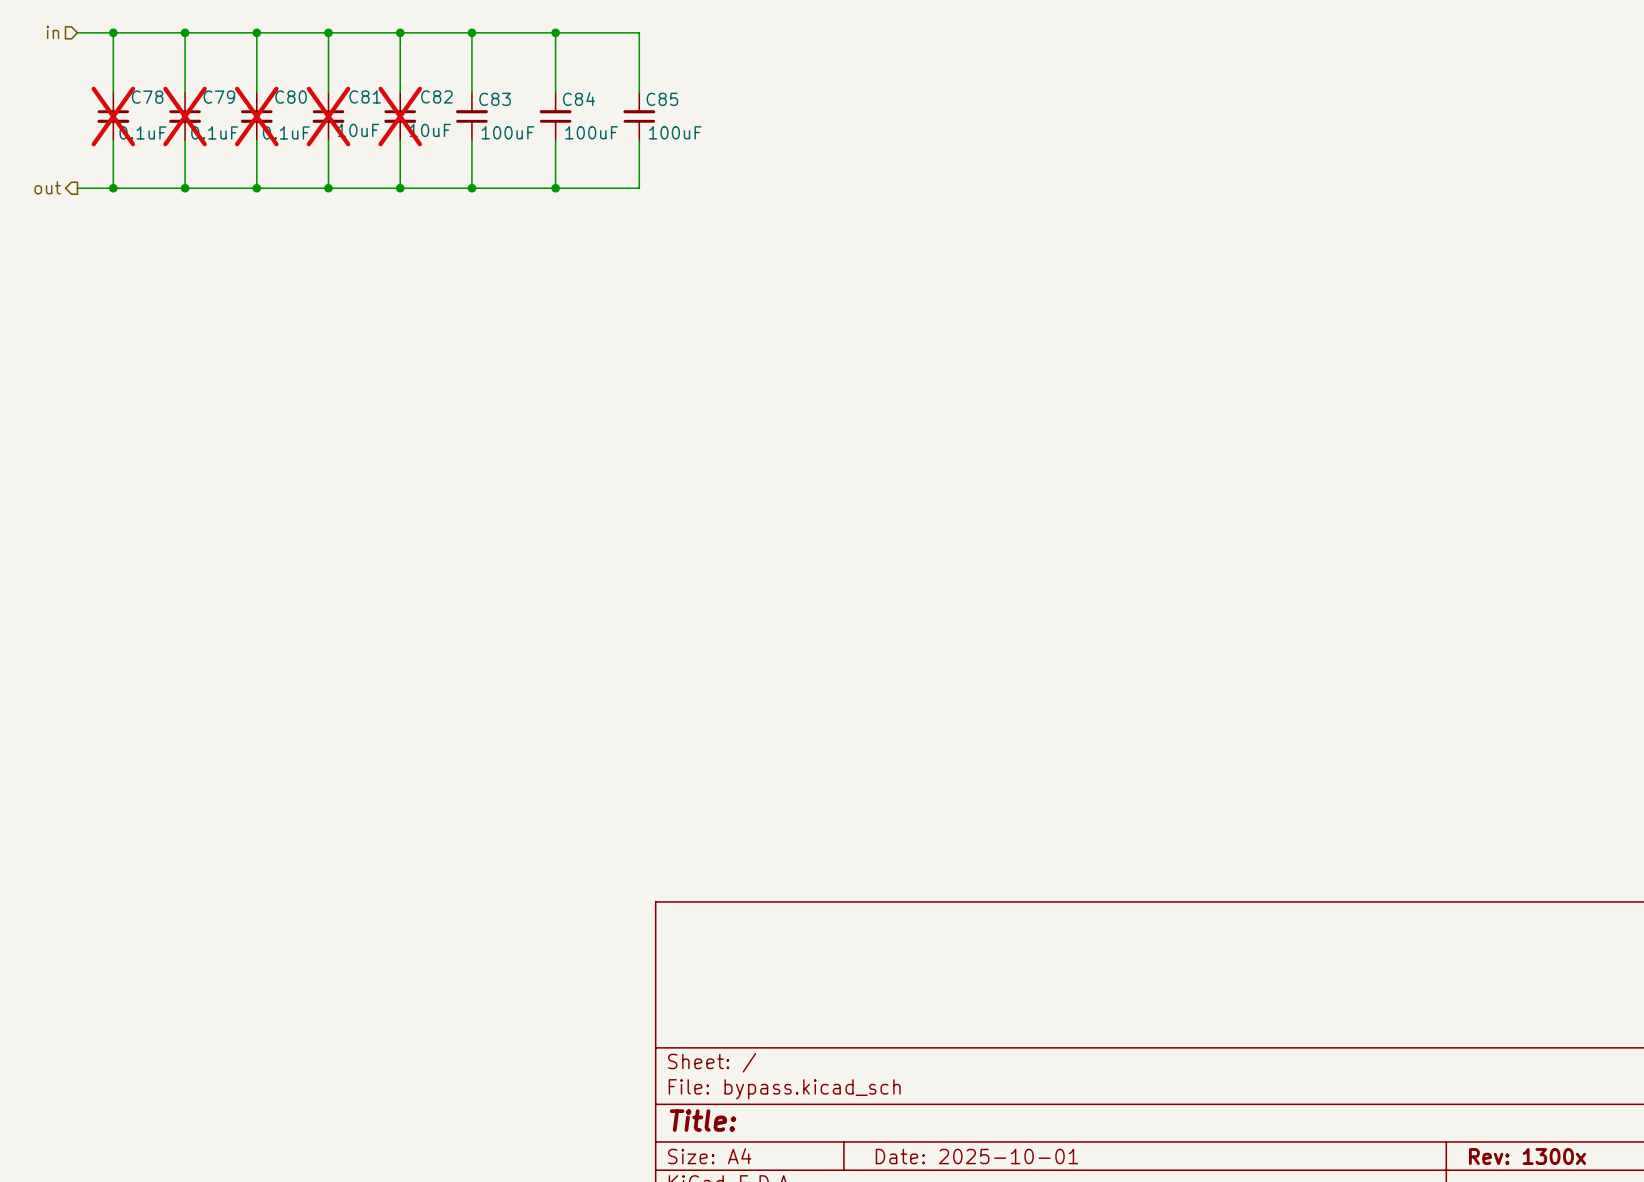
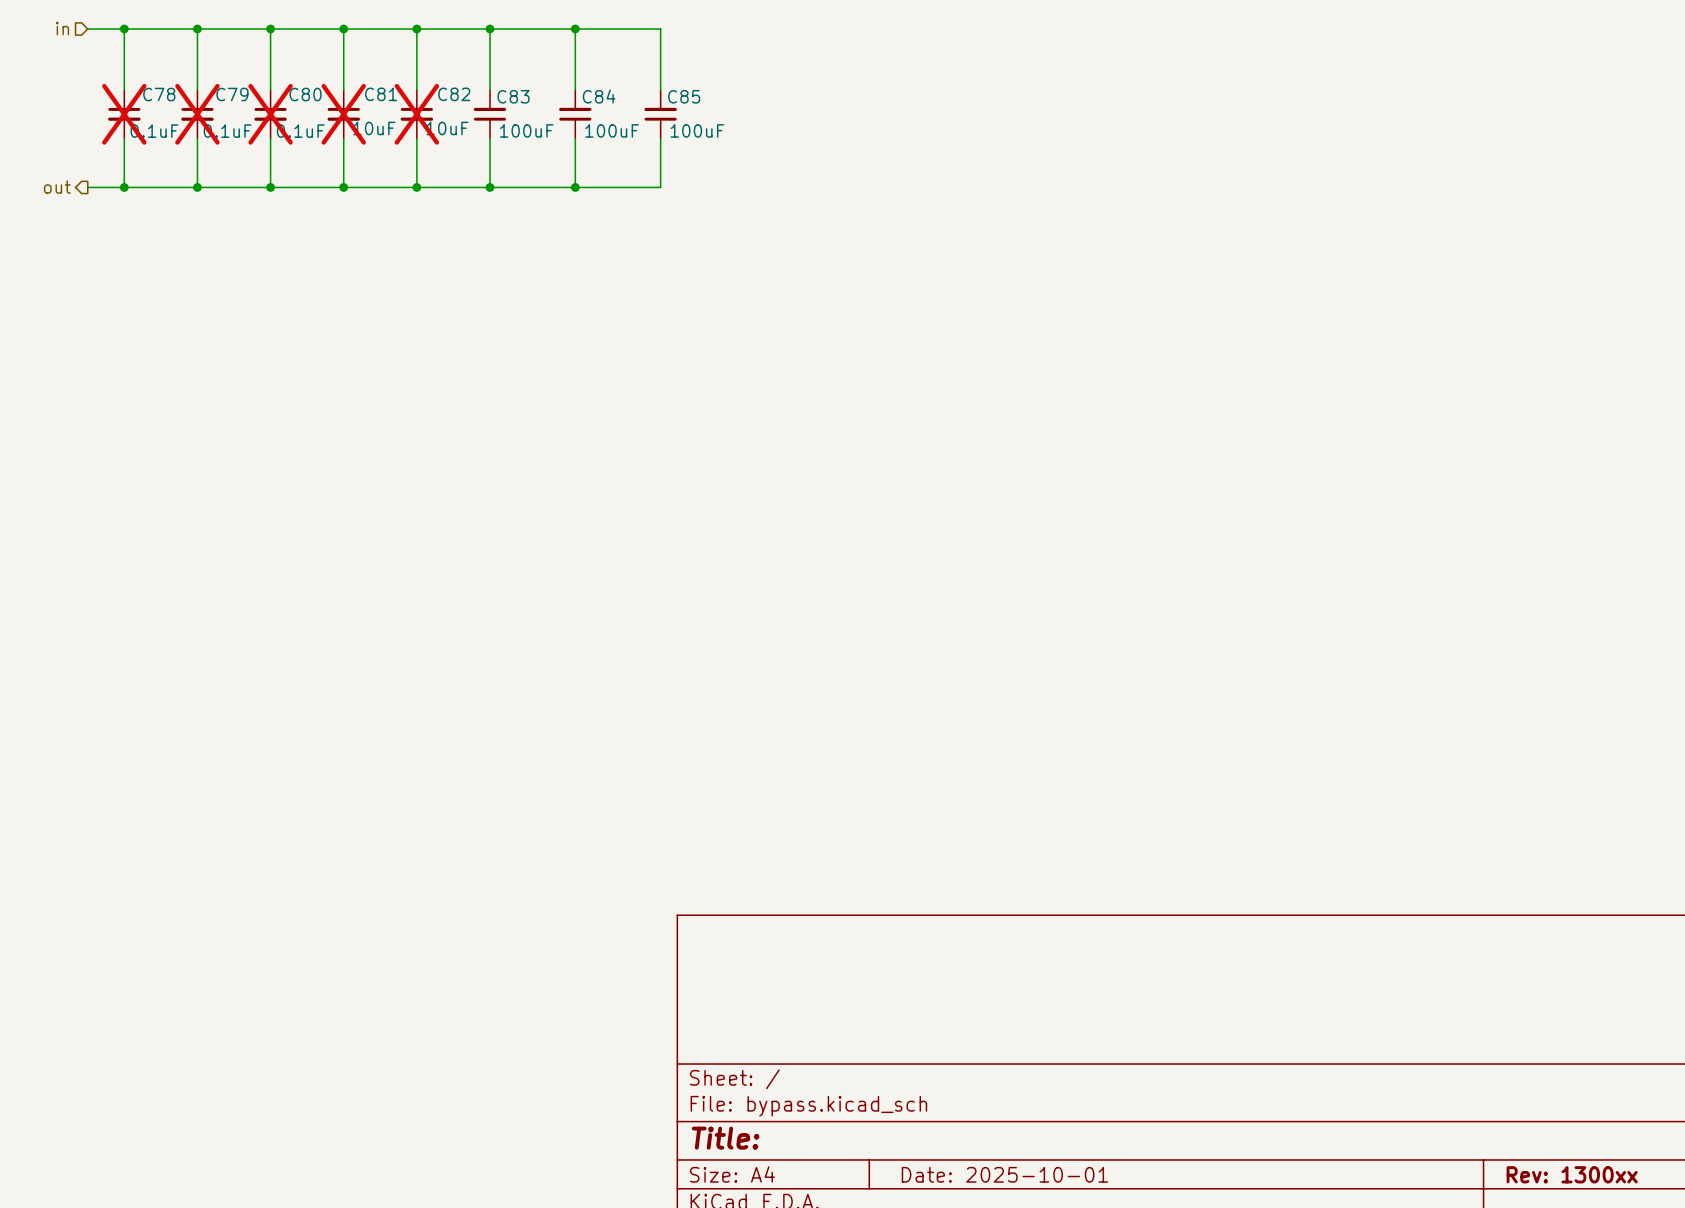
title block: Rev: 1300x (1527, 1156) -> Rev: 1300xx (1572, 1174)

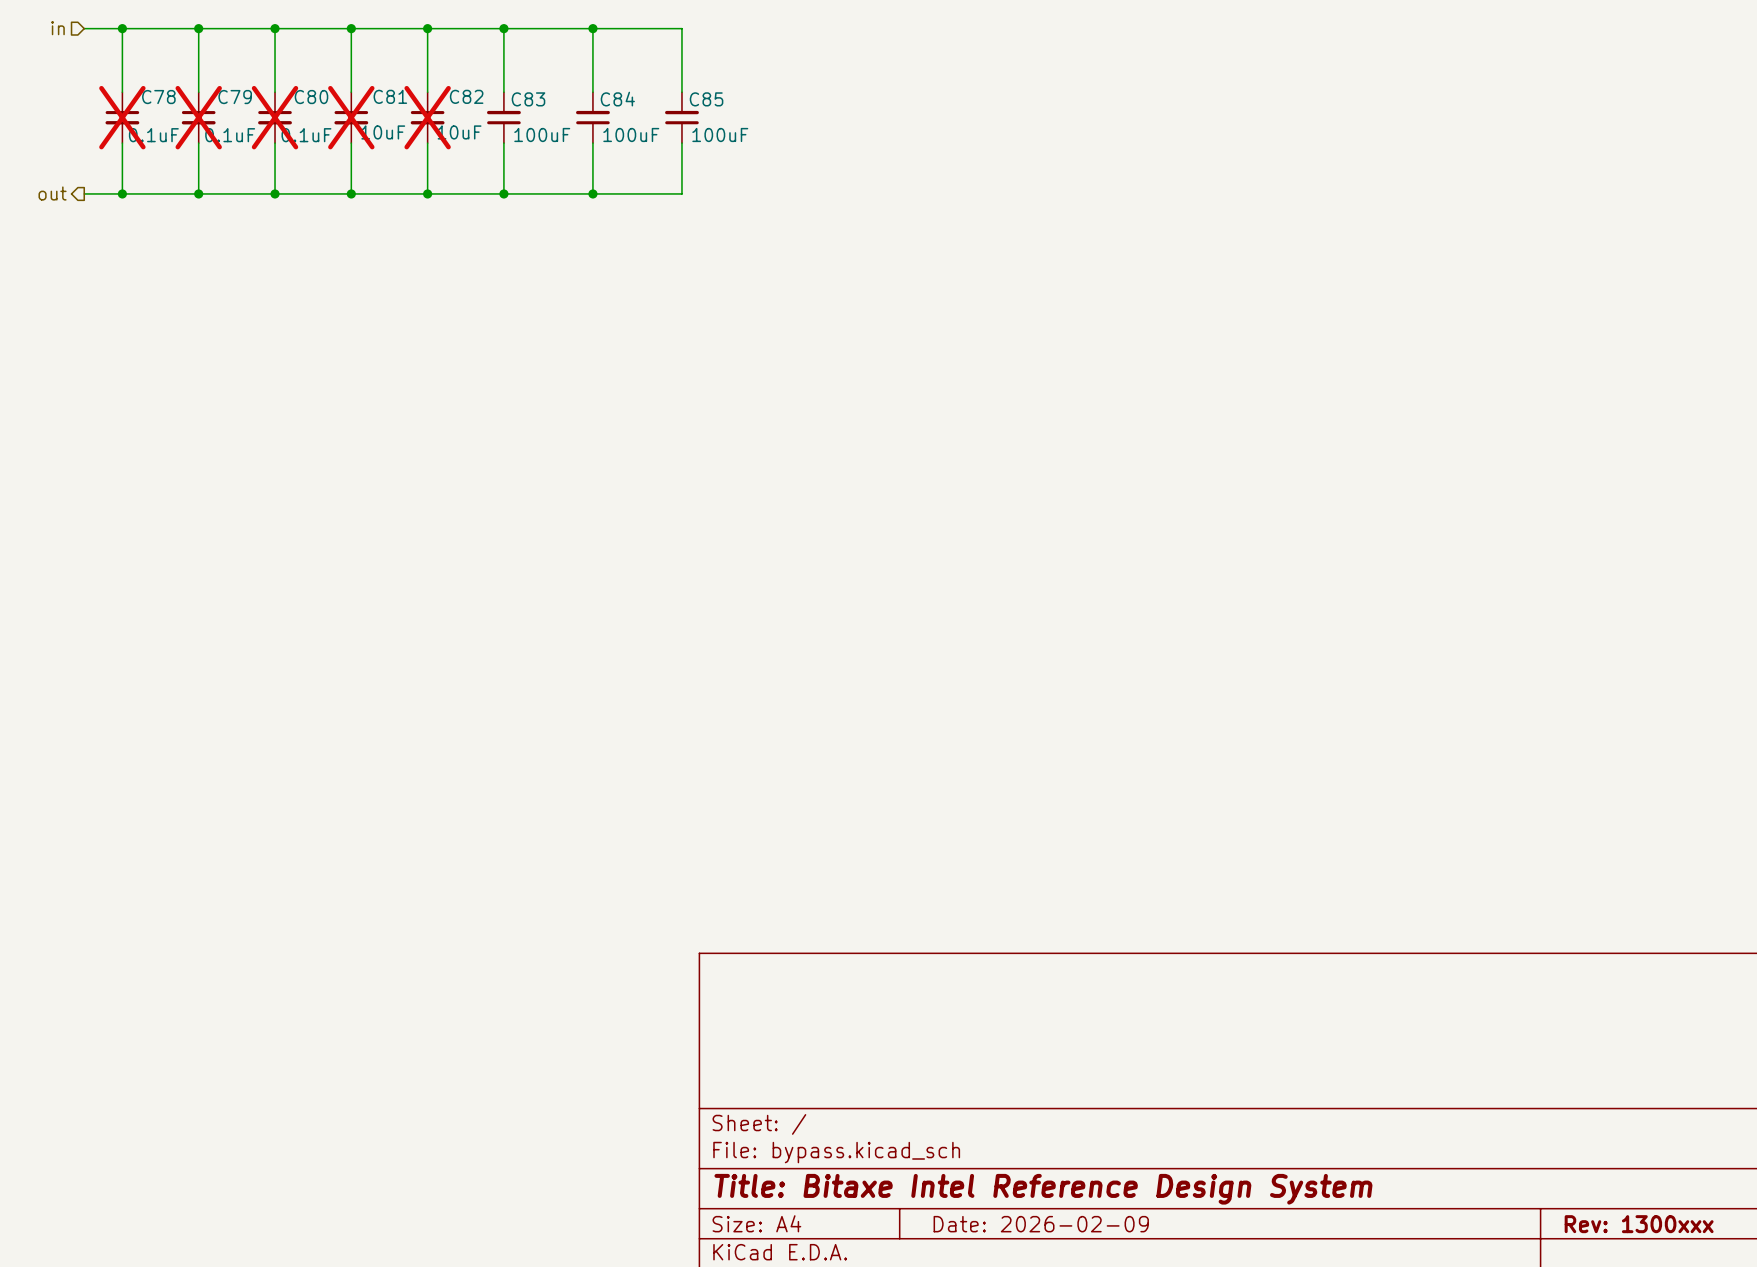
title block: Title: (725, 1138) -> Title: Bitaxe Intel Reference Design System (1043, 1189)
title block: Date: 2025-10-01 (1004, 1174) -> Date: 2026-02-09 (1041, 1224)
title block: Rev: 1300xx (1572, 1174) -> Rev: 1300xxx (1639, 1224)

